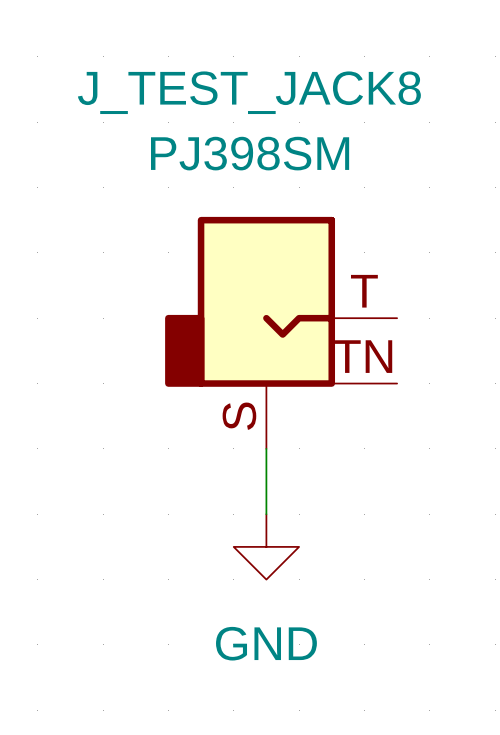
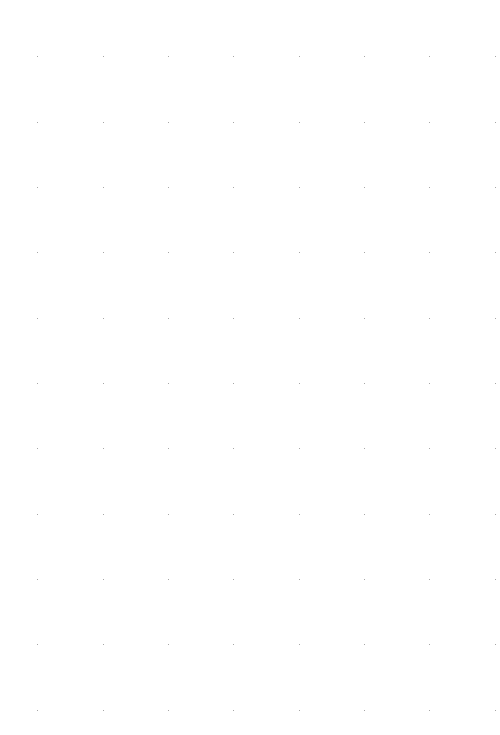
J_TEST_JACK8: PJ398SM (281, 332) -> none
wire: (266, 448) (266, 514) -> none
power symbol: GND (266, 546) -> none

